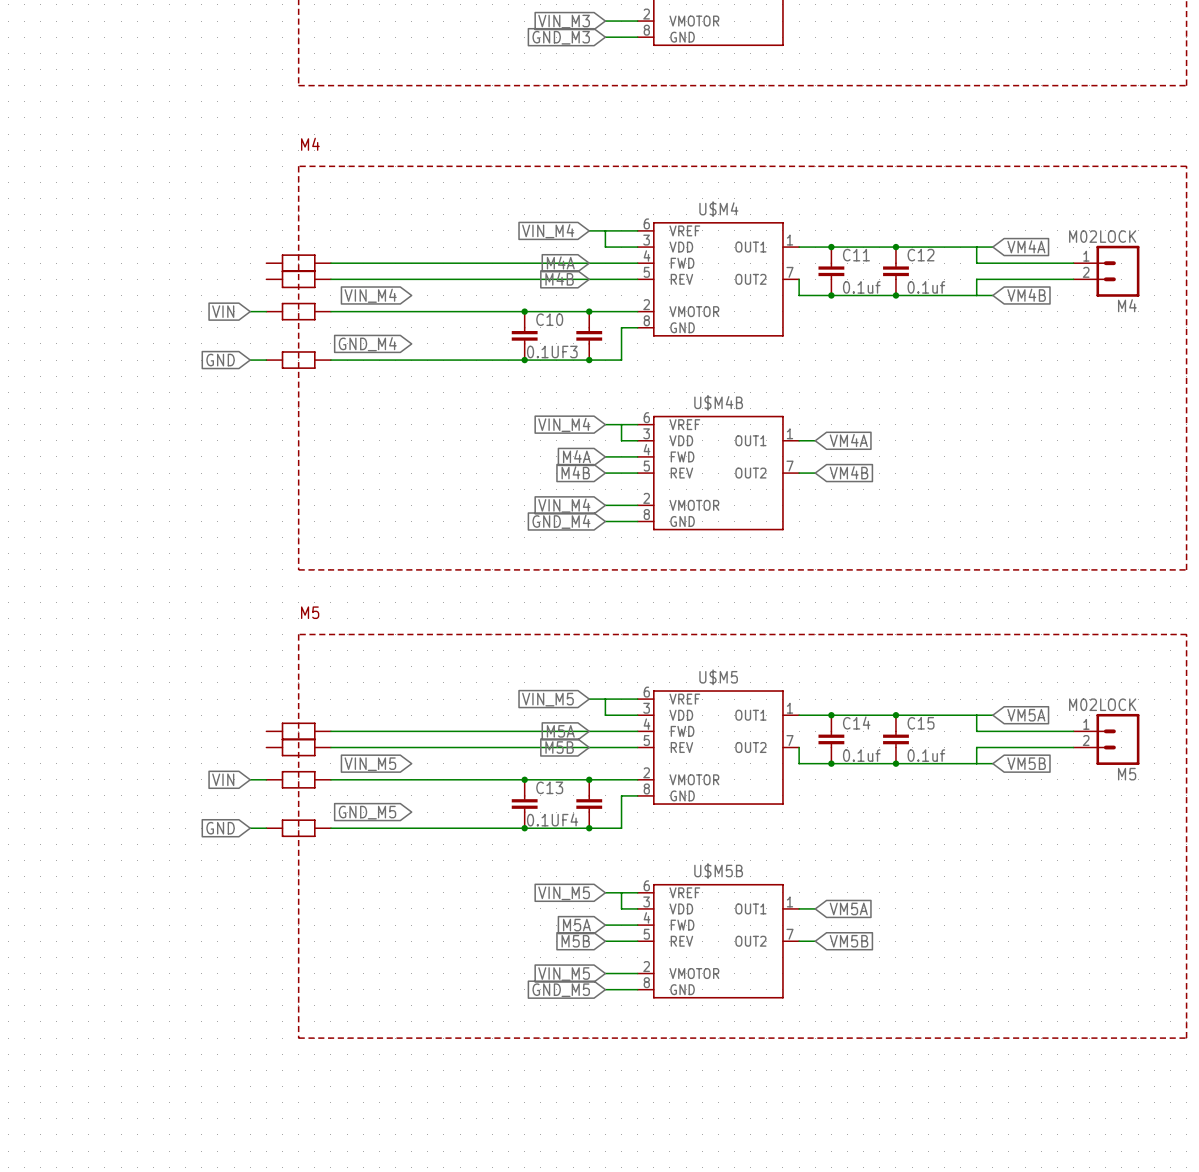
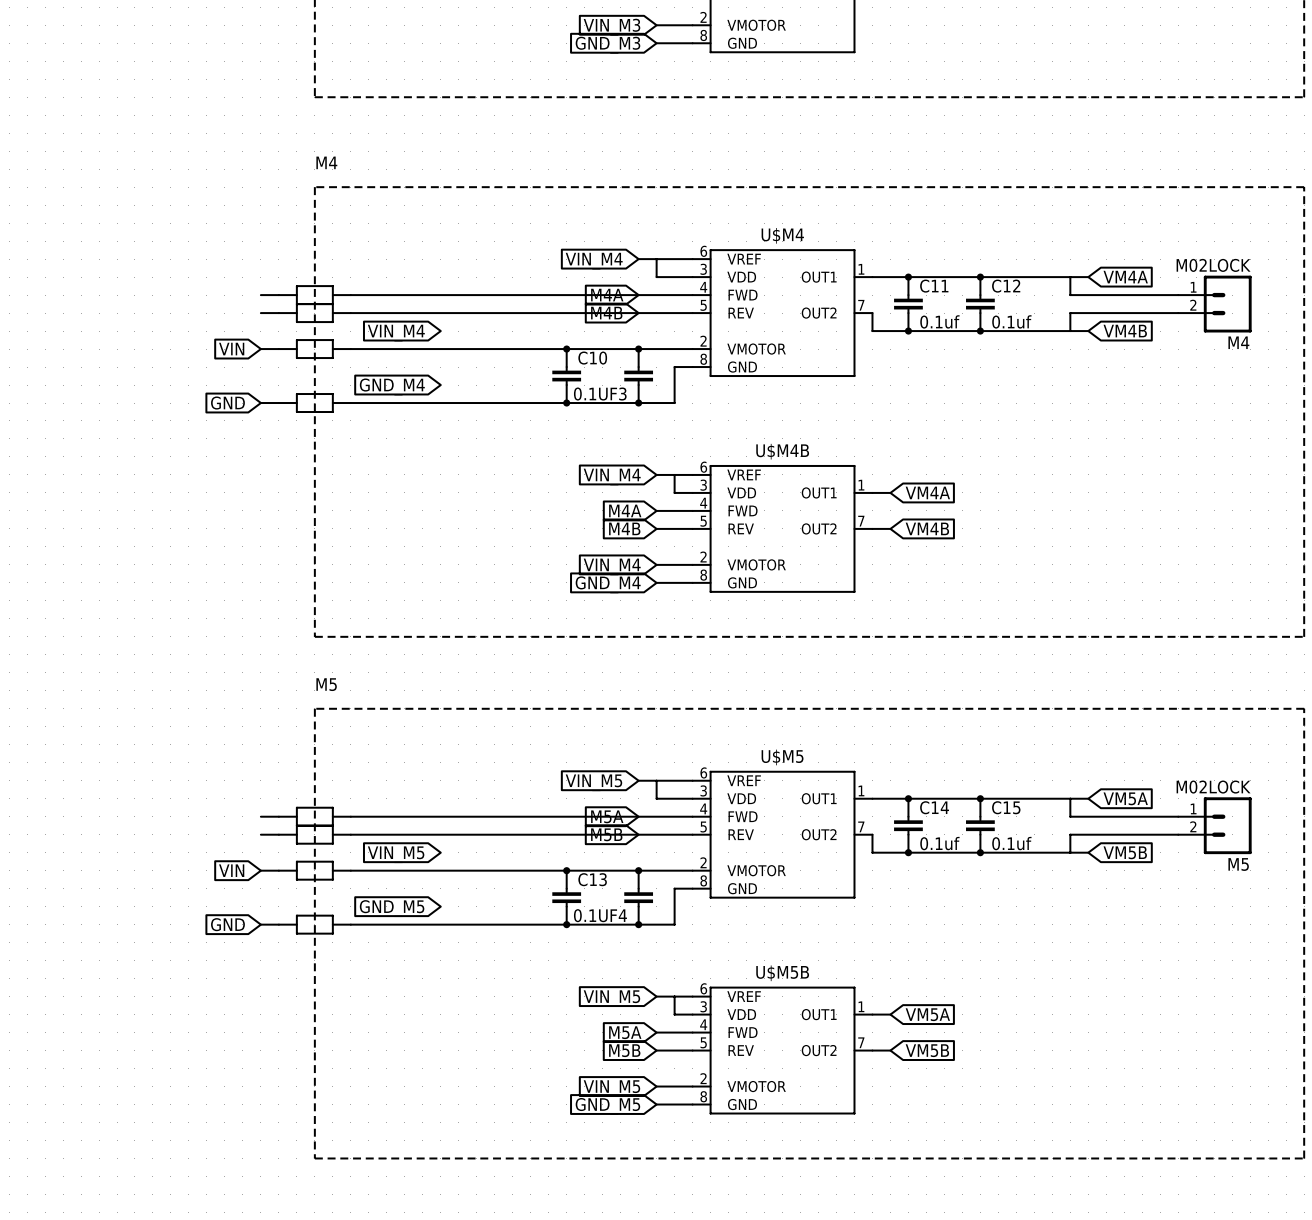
wire: none -> (260, 295) (278, 295)
wire: none -> (260, 313) (278, 313)
wire: none -> (260, 816) (278, 816)
wire: none -> (260, 834) (278, 834)

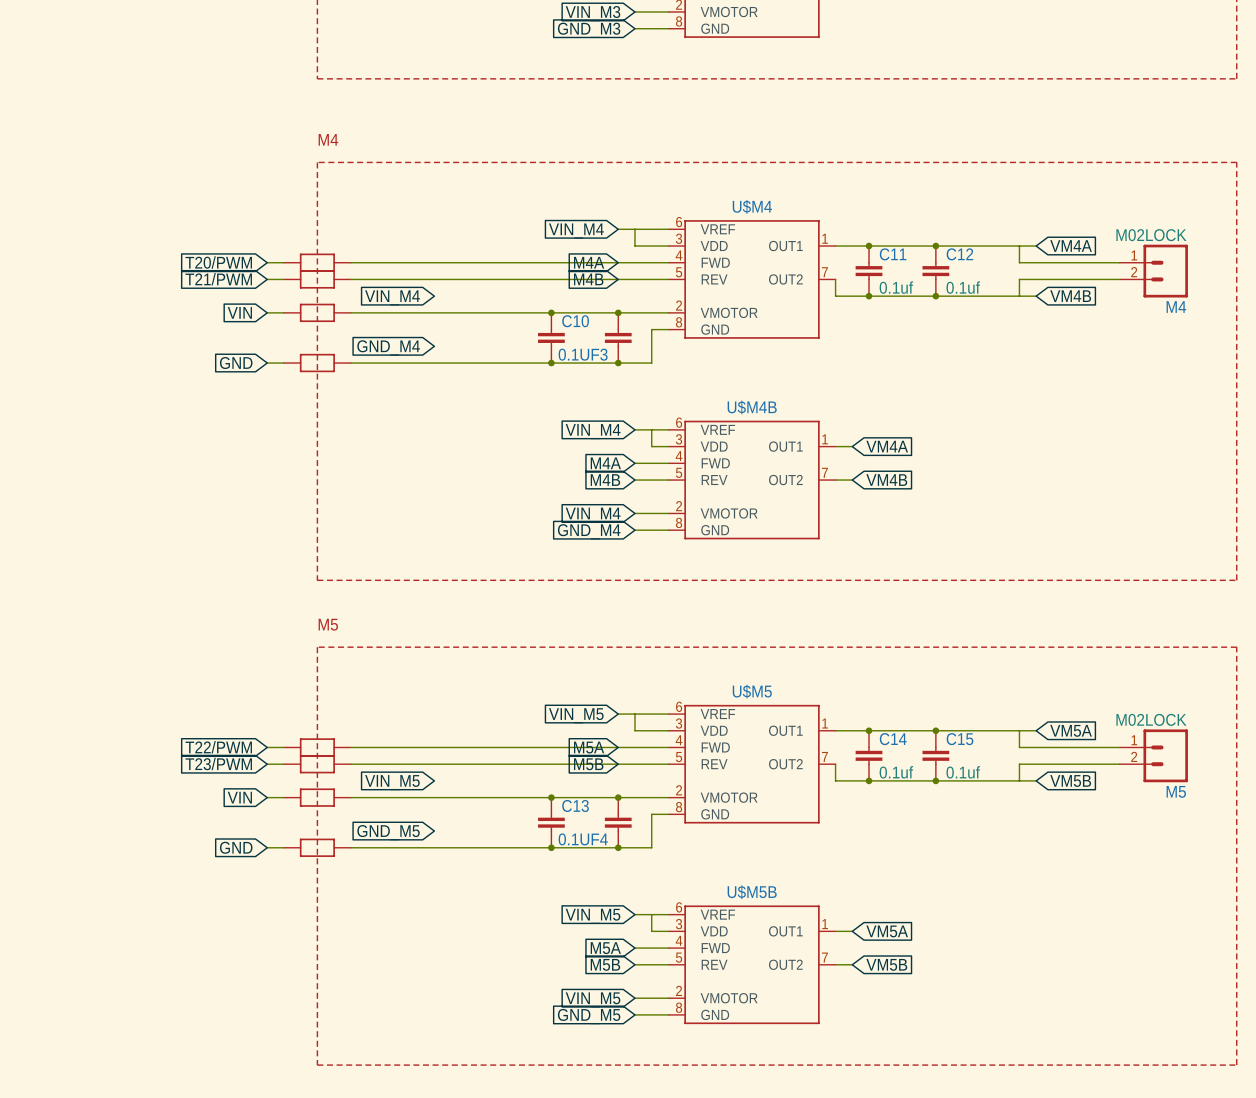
global label: none -> T20/PWM (218, 262)
global label: none -> T21/PWM (218, 279)
global label: none -> T22/PWM (218, 747)
global label: none -> T23/PWM (218, 763)

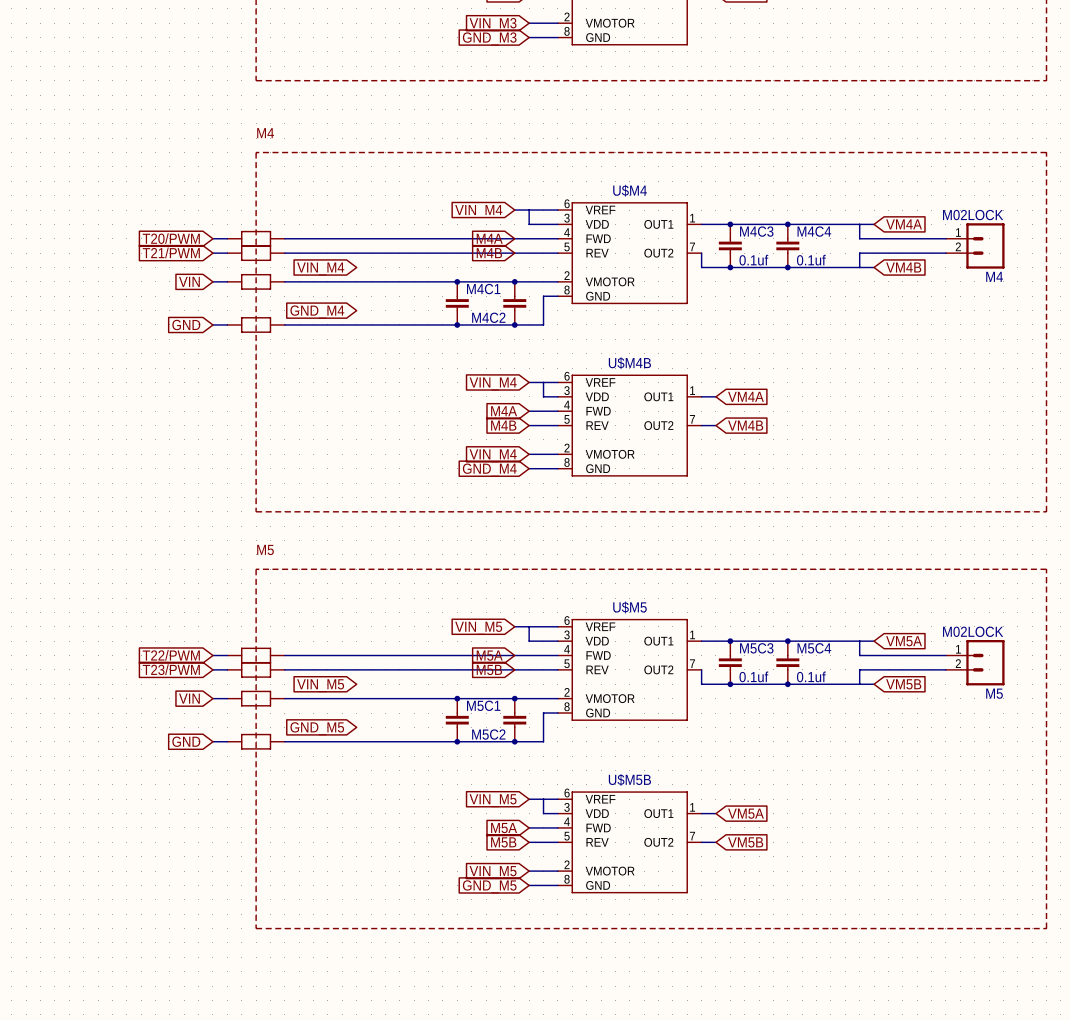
C11 name: C11 (893, 254) -> M4C3 (756, 231)
C12 name: C12 (959, 254) -> M4C4 (814, 231)
C10 name: C10 (575, 321) -> M4C1 (483, 289)
0.1UF3 name: 0.1UF3 (583, 354) -> M4C2 (488, 317)
C14 name: C14 (893, 739) -> M5C3 (756, 648)
C15 name: C15 (960, 739) -> M5C4 (814, 648)
C13 name: C13 (575, 805) -> M5C1 (483, 705)
0.1UF4 name: 0.1UF4 (583, 839) -> M5C2 (488, 734)

